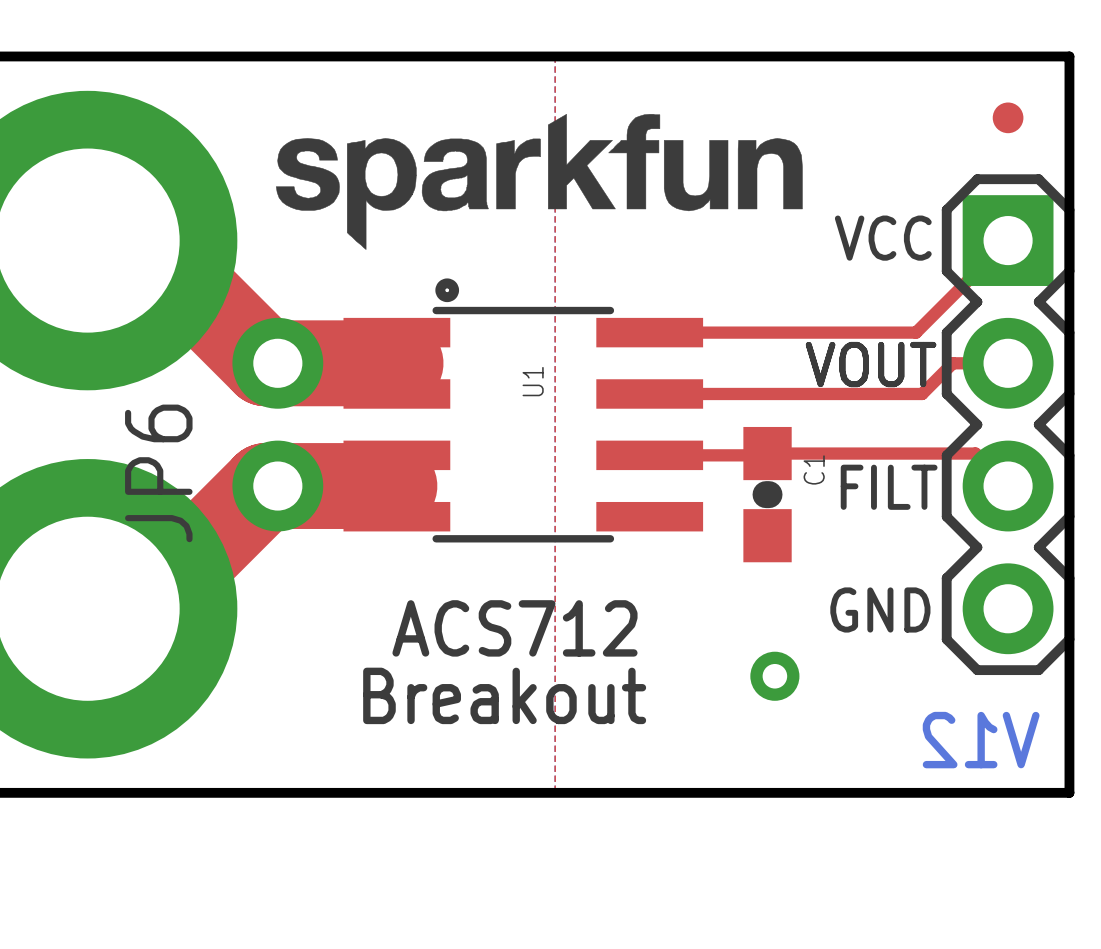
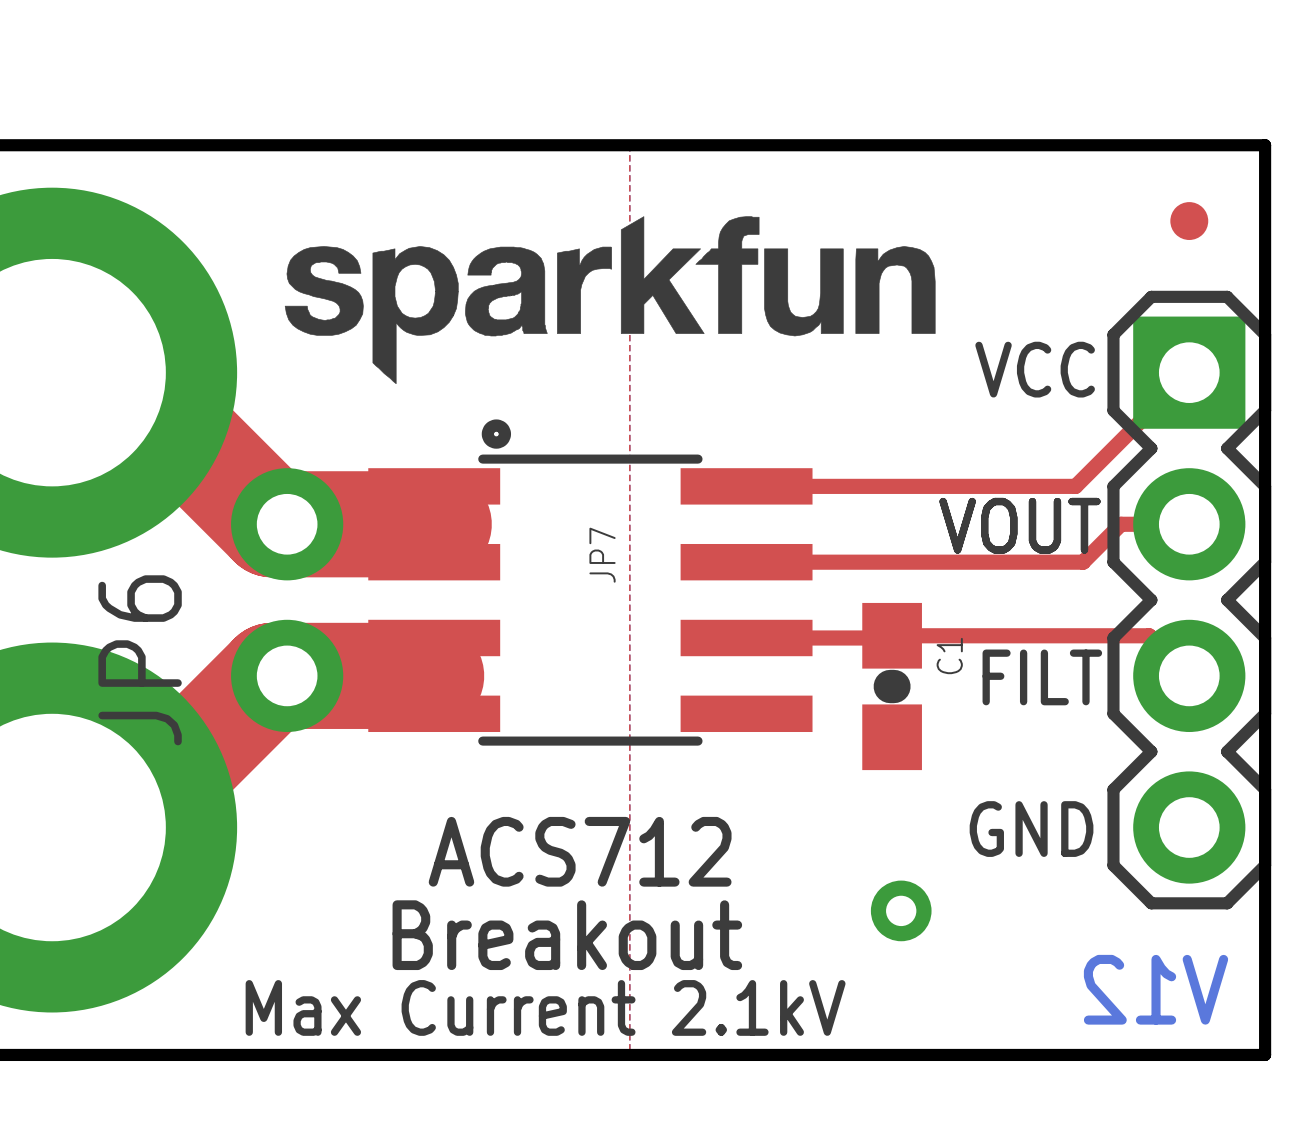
U1 name: U1 (533, 381) -> JP7 (602, 555)
text: none -> Max Current 2.1kV (545, 1007)

